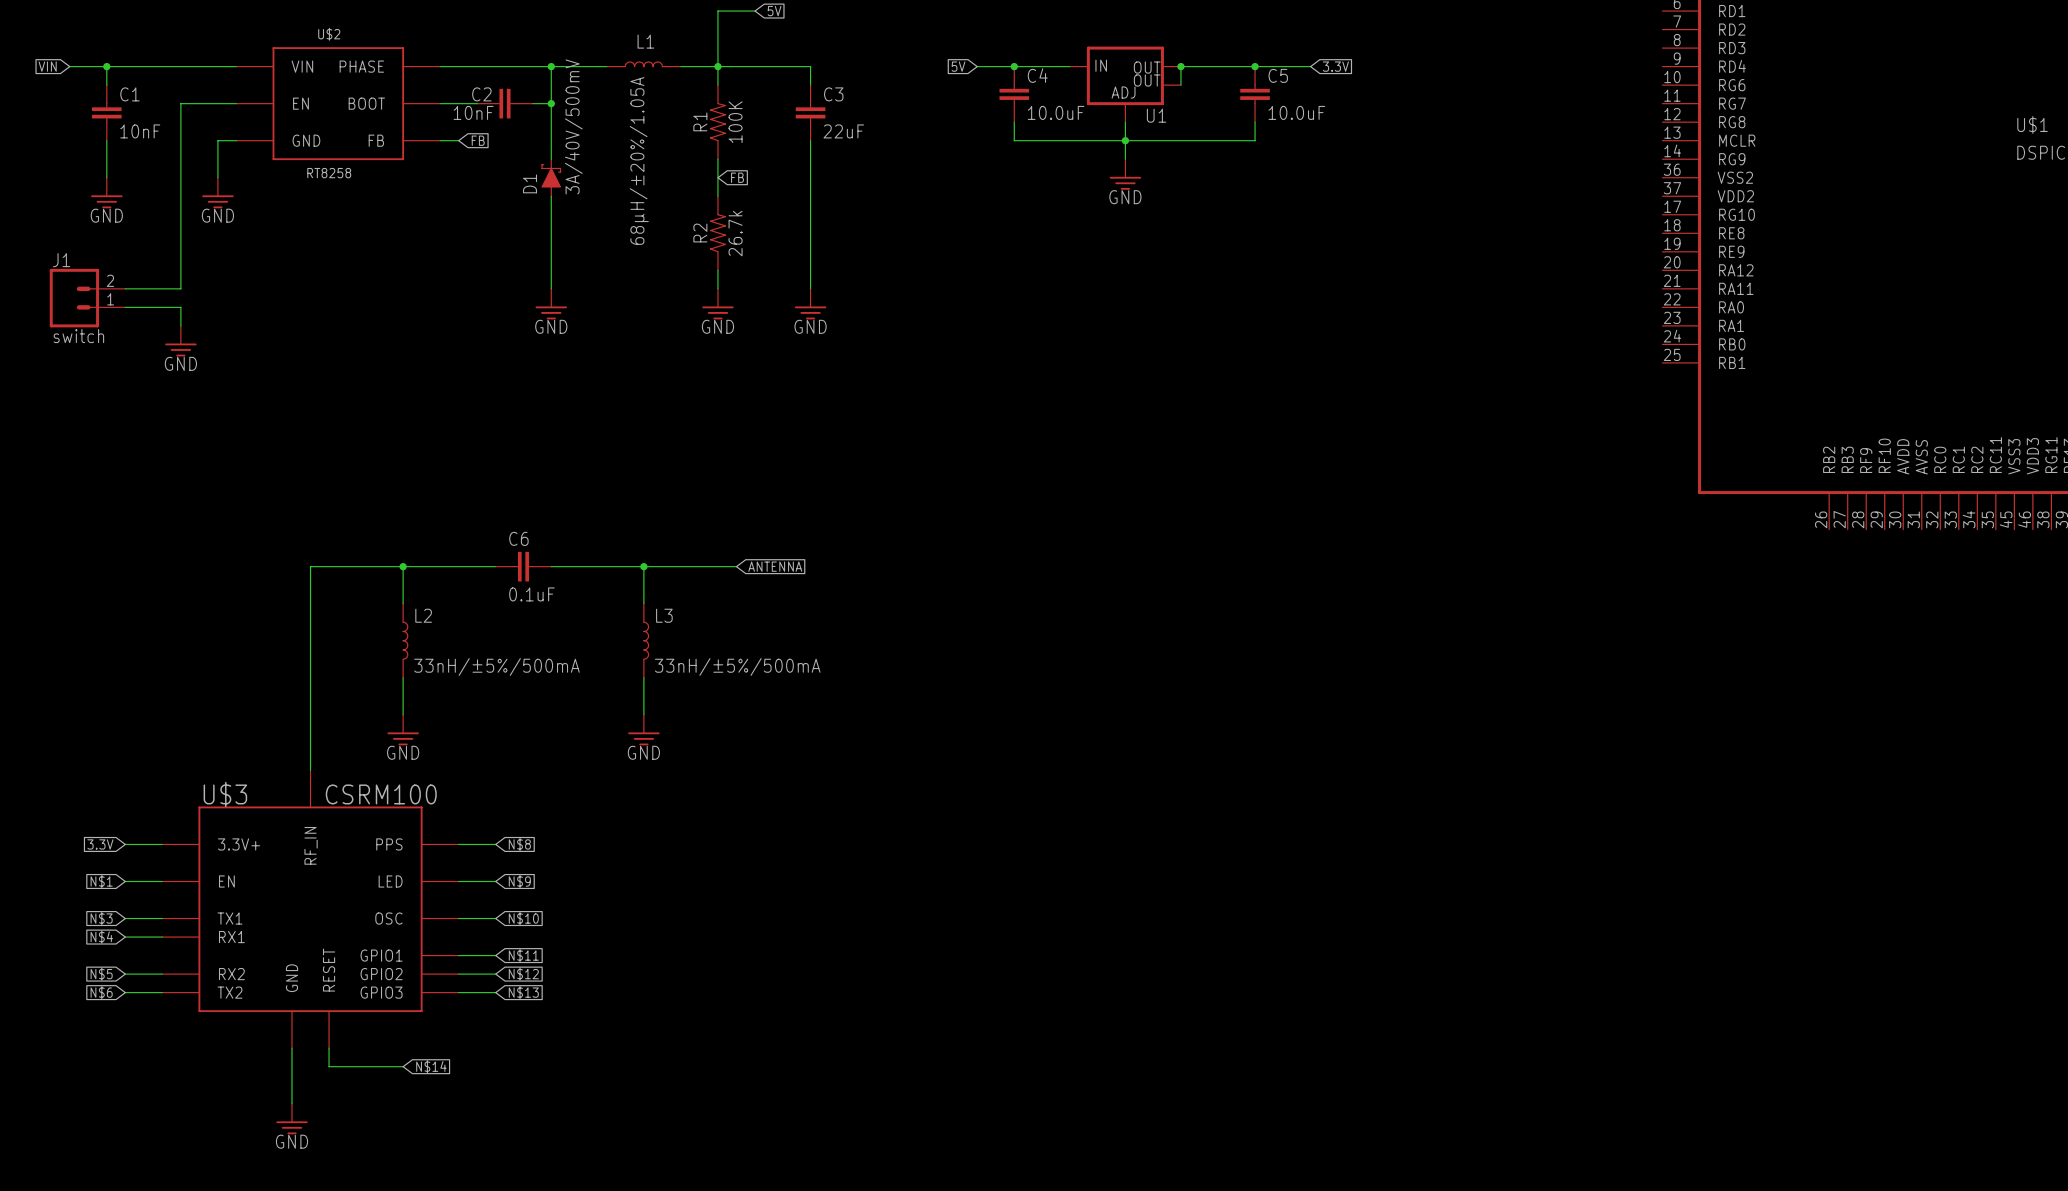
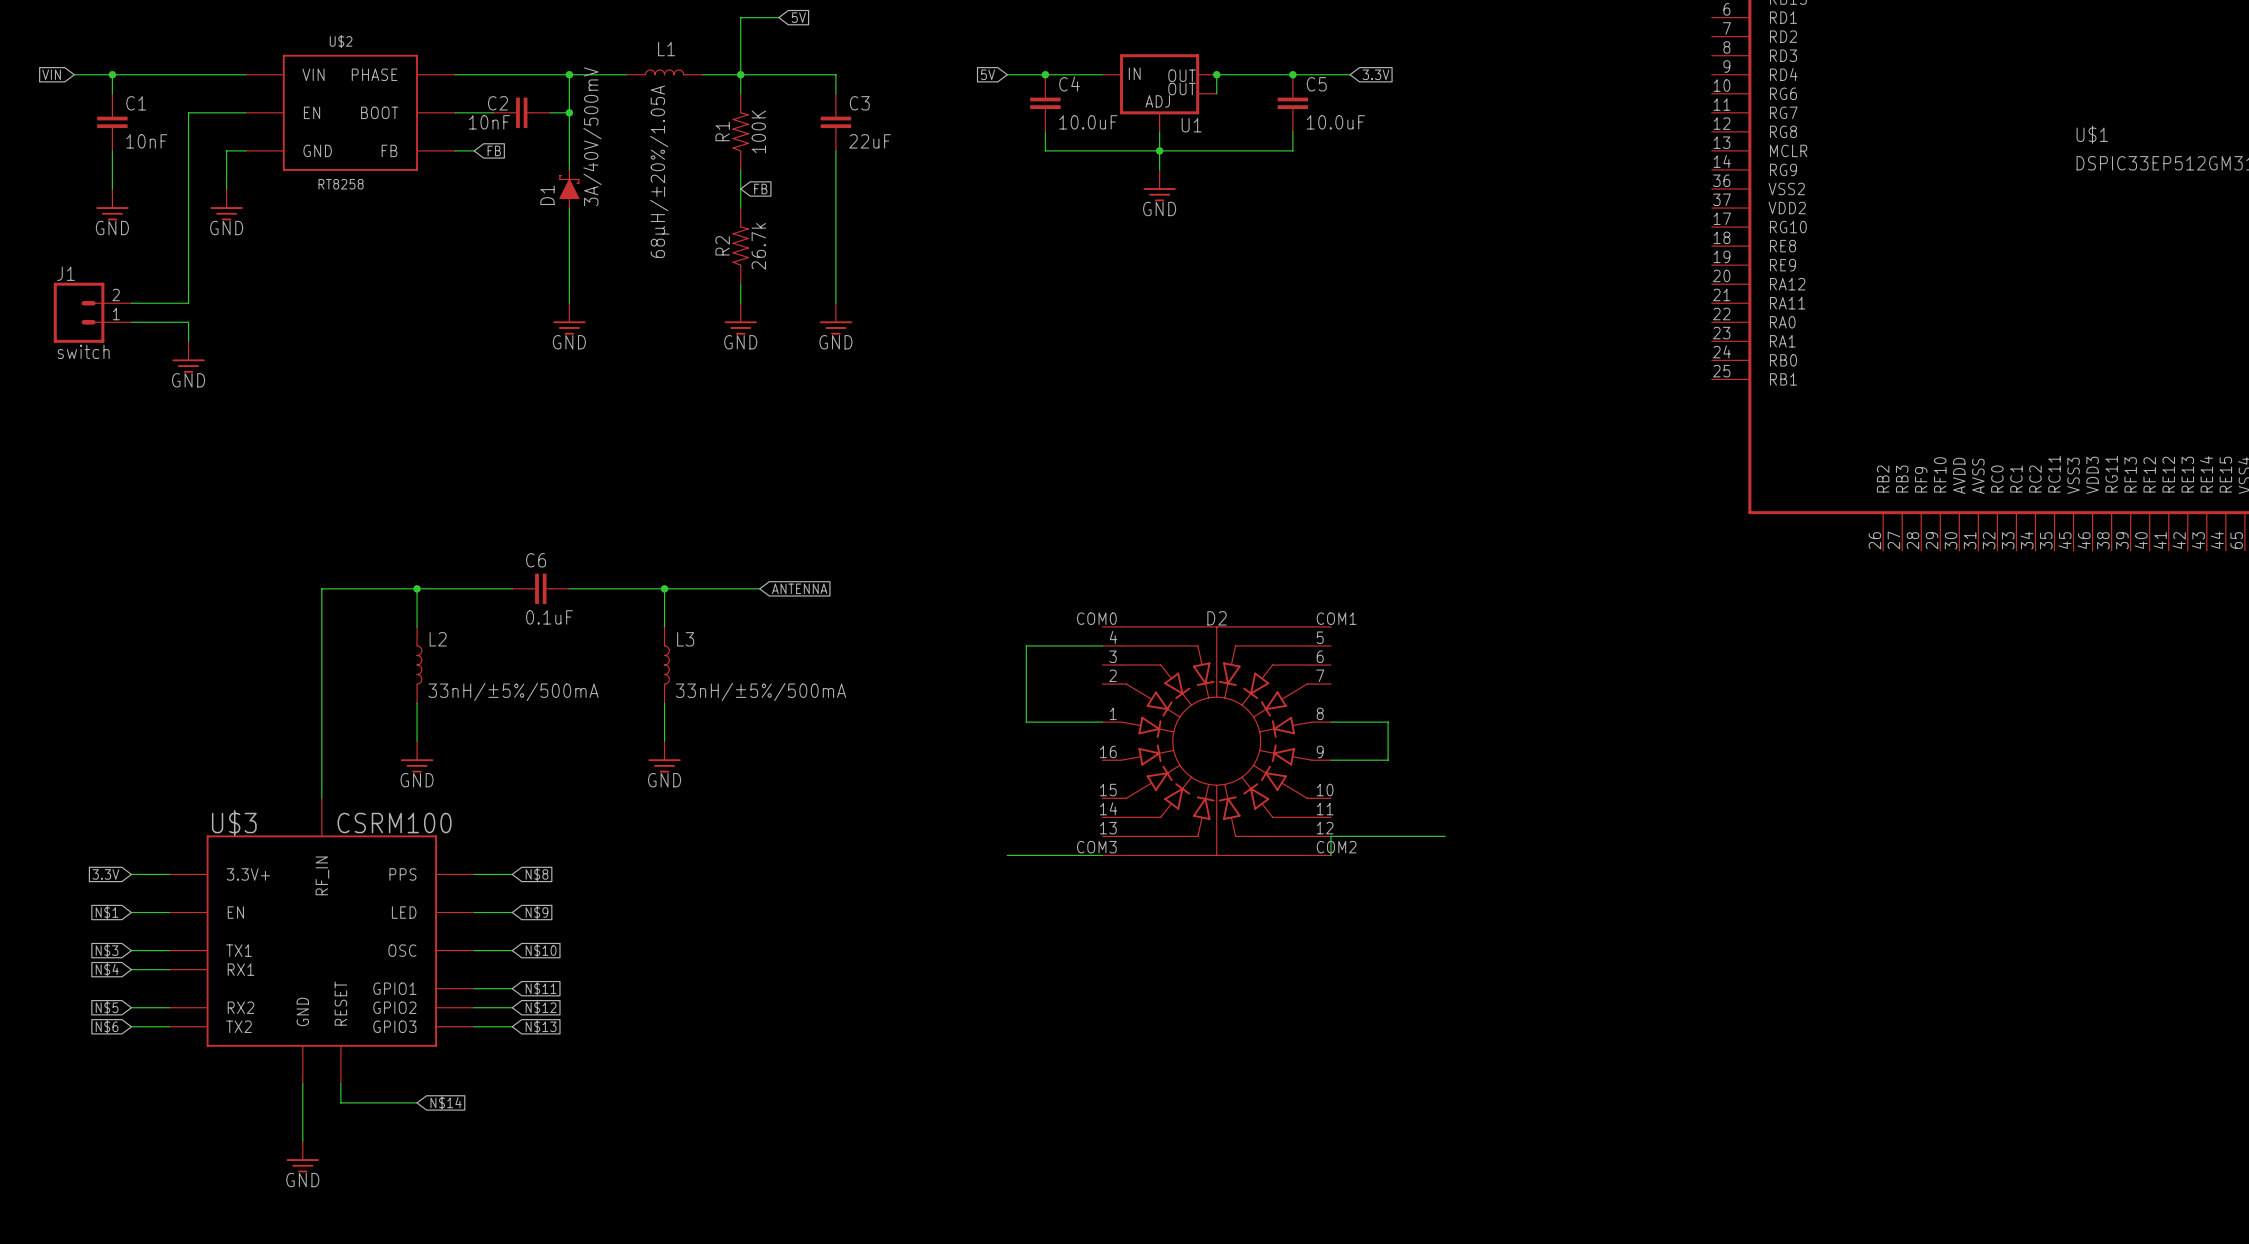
wire: none -> (1102, 645) (1026, 645) (1026, 722) (1102, 722)
wire: none -> (1330, 722) (1388, 722) (1388, 760) (1330, 760)
D2: none -> (1216, 741)
wire: none -> (1445, 836) (1330, 836) (1330, 855)
wire: none -> (1007, 855) (1102, 855)

